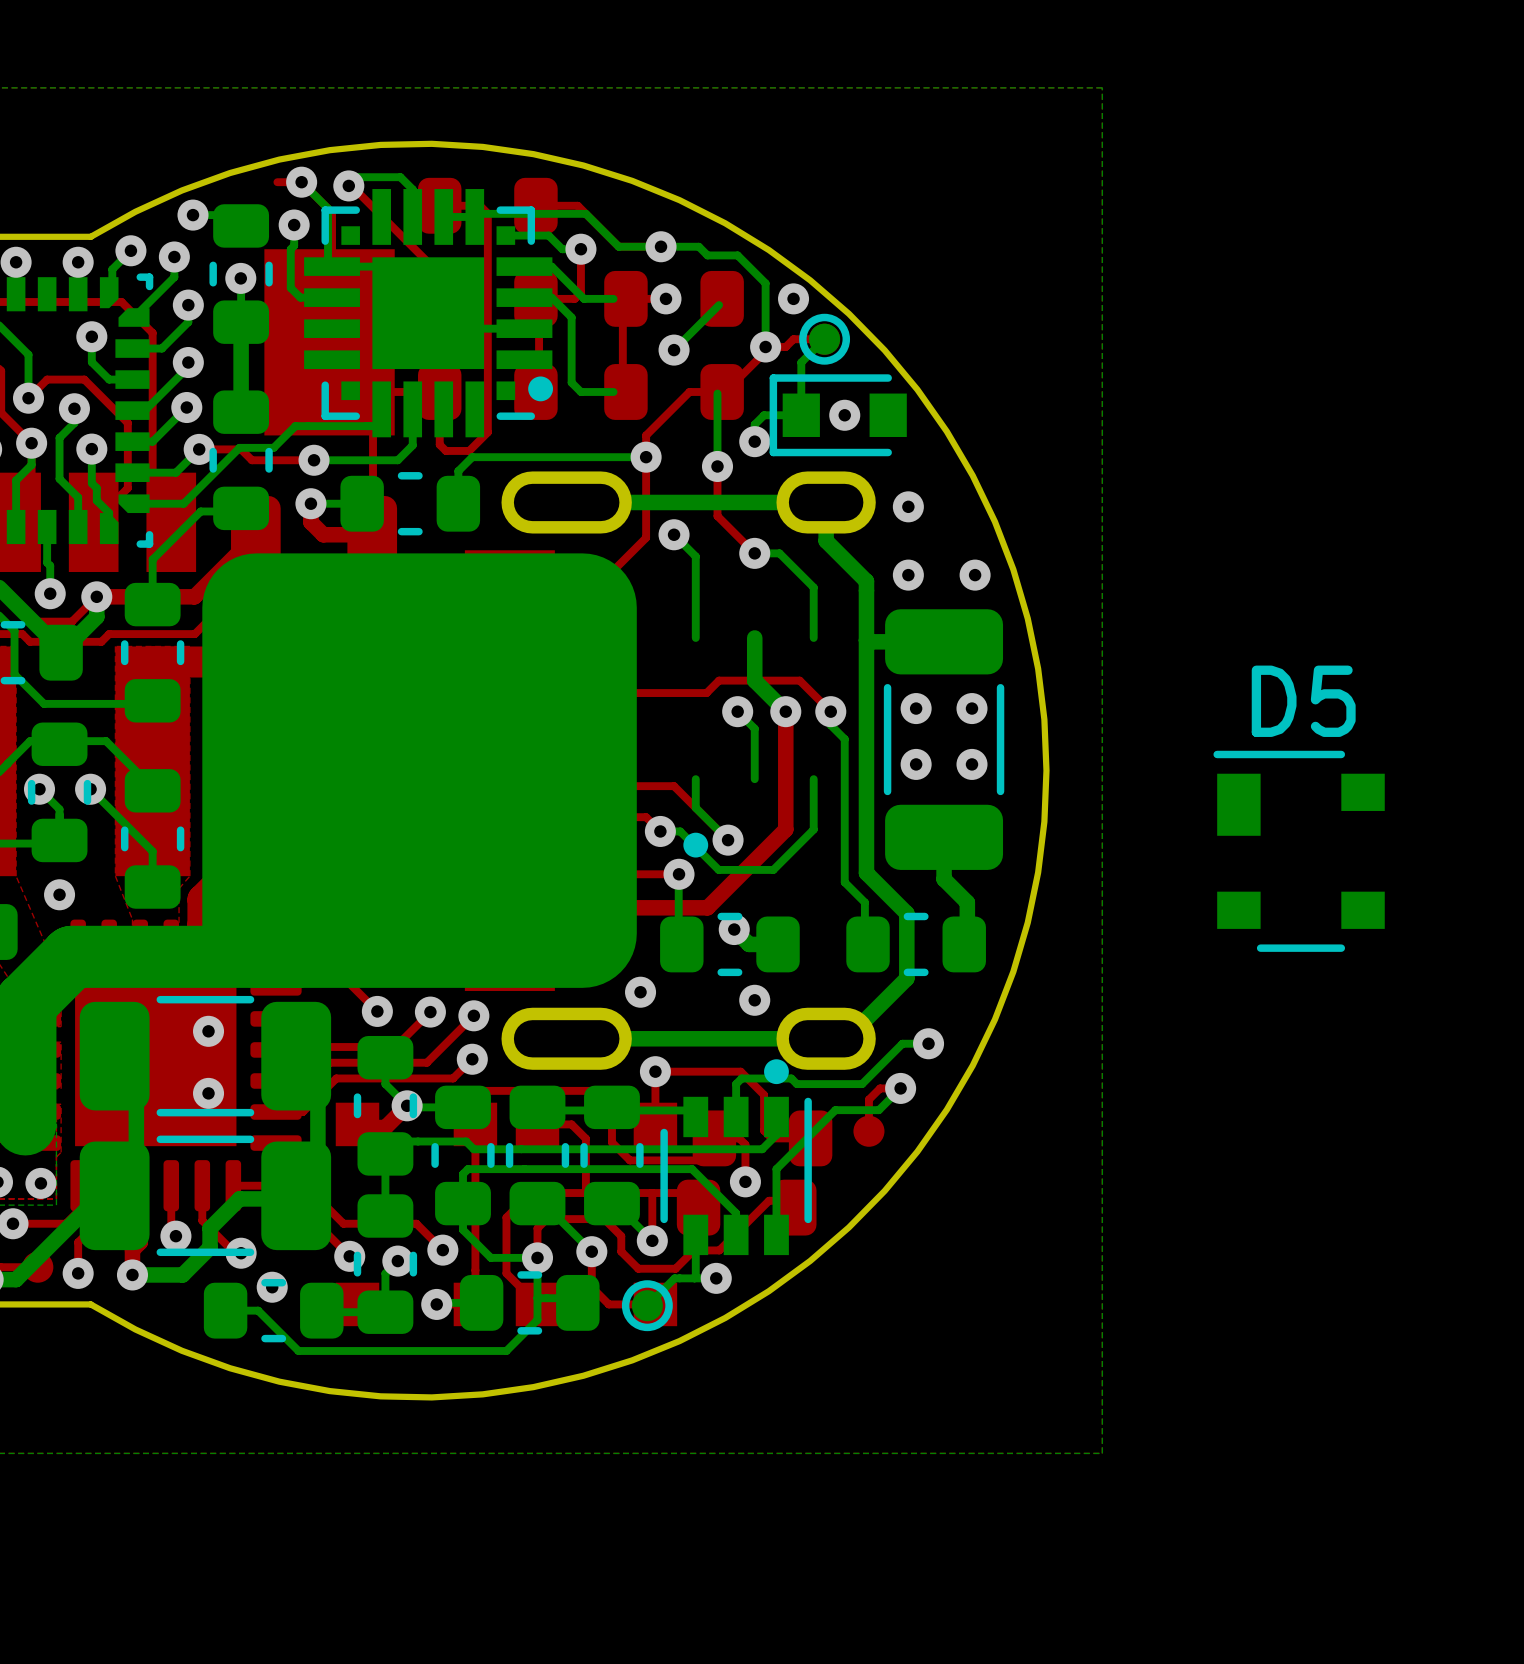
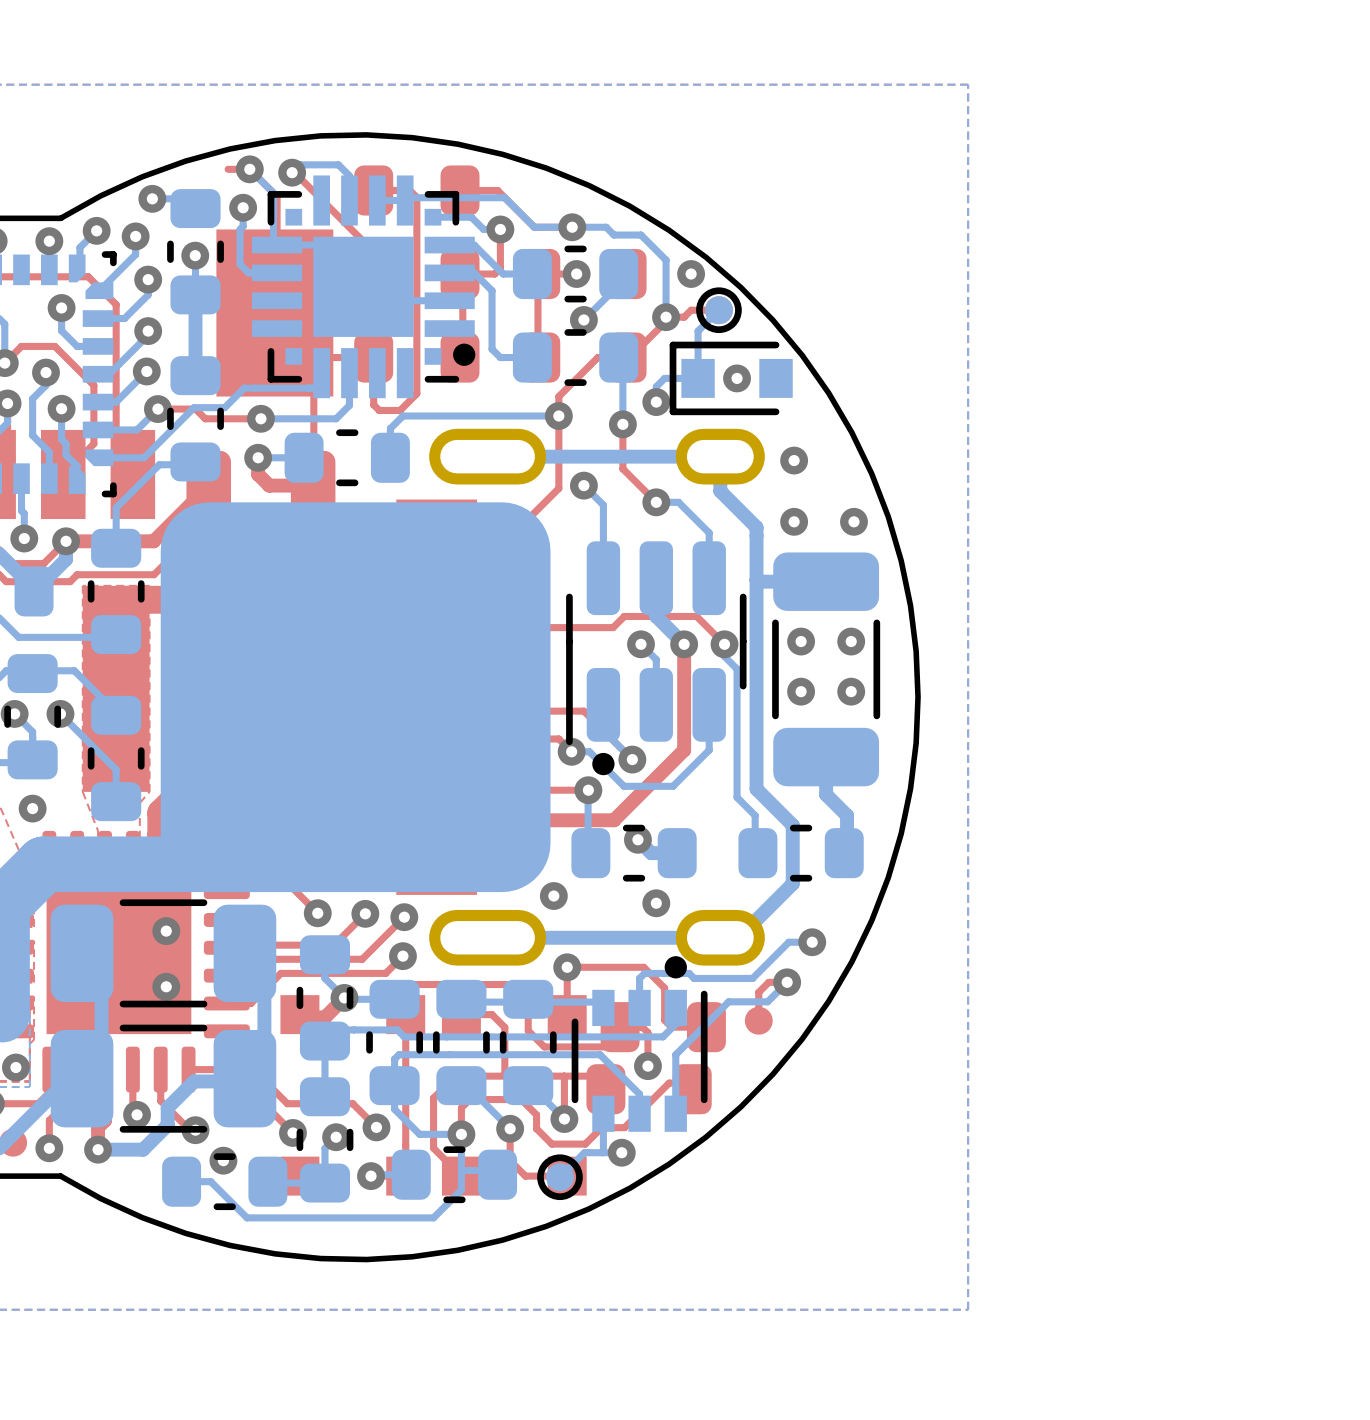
part: none -> (575, 274)
part: none -> (575, 357)
part: none -> (656, 643)
D5: (1299, 851) -> none

